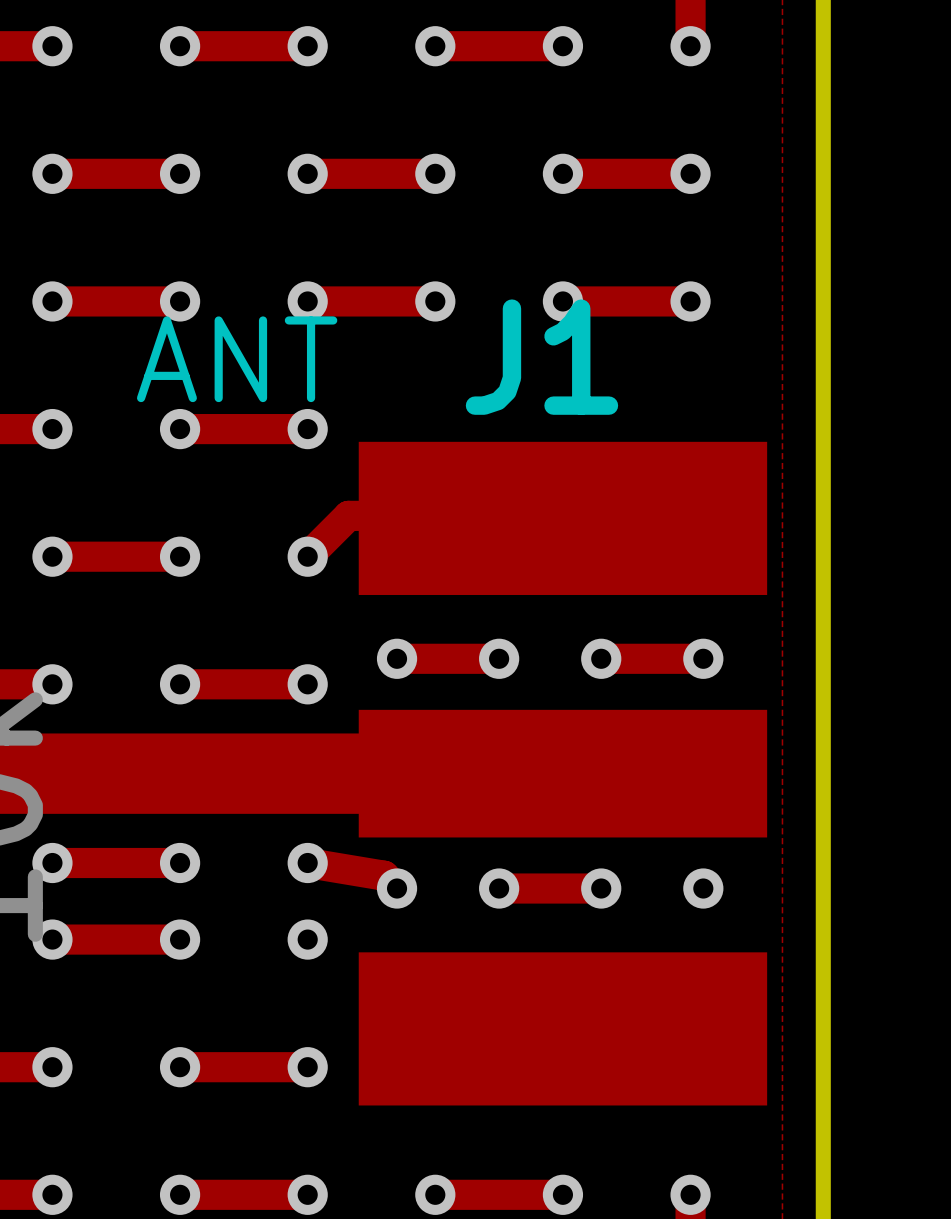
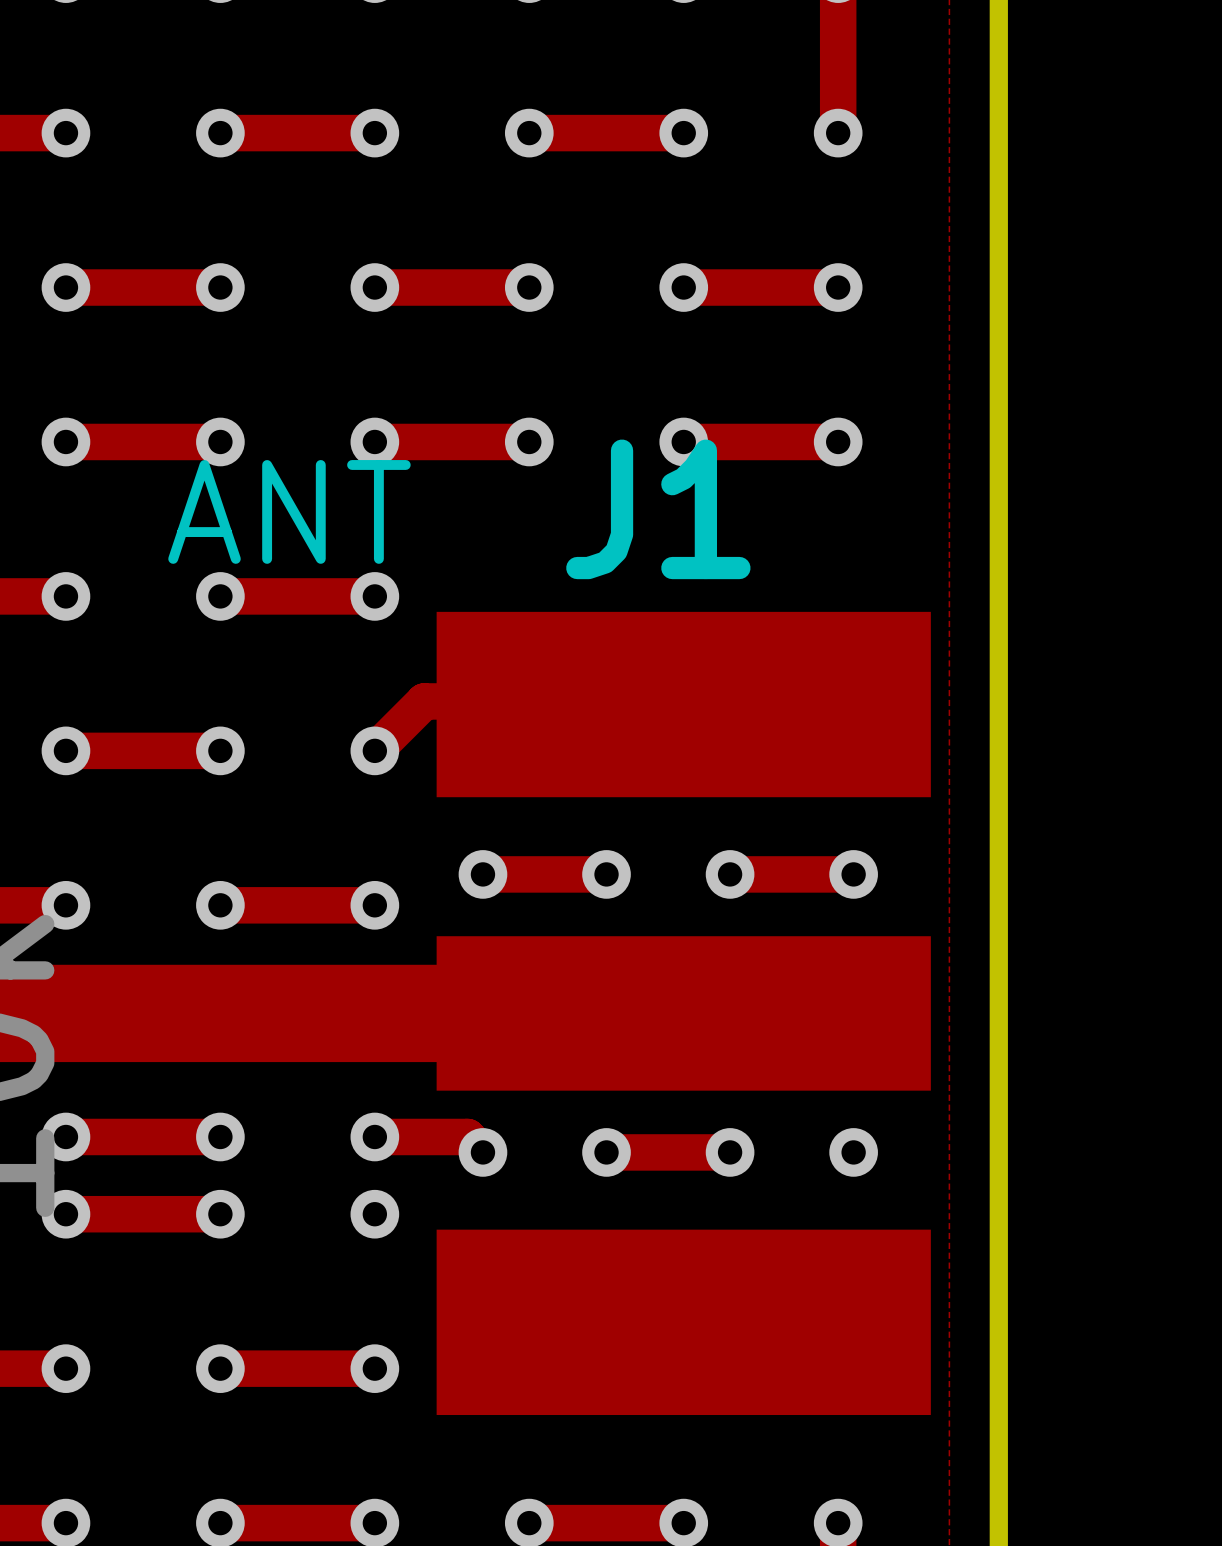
track: (52, 862) (180, 862) -> (65, 1136) (220, 1136)
via position: (52, 862) -> (65, 1136)
via position: (180, 862) -> (220, 1136)
track: (307, 862) (384, 875) -> (374, 1136) (467, 1136)
via position: (307, 862) -> (374, 1136)

